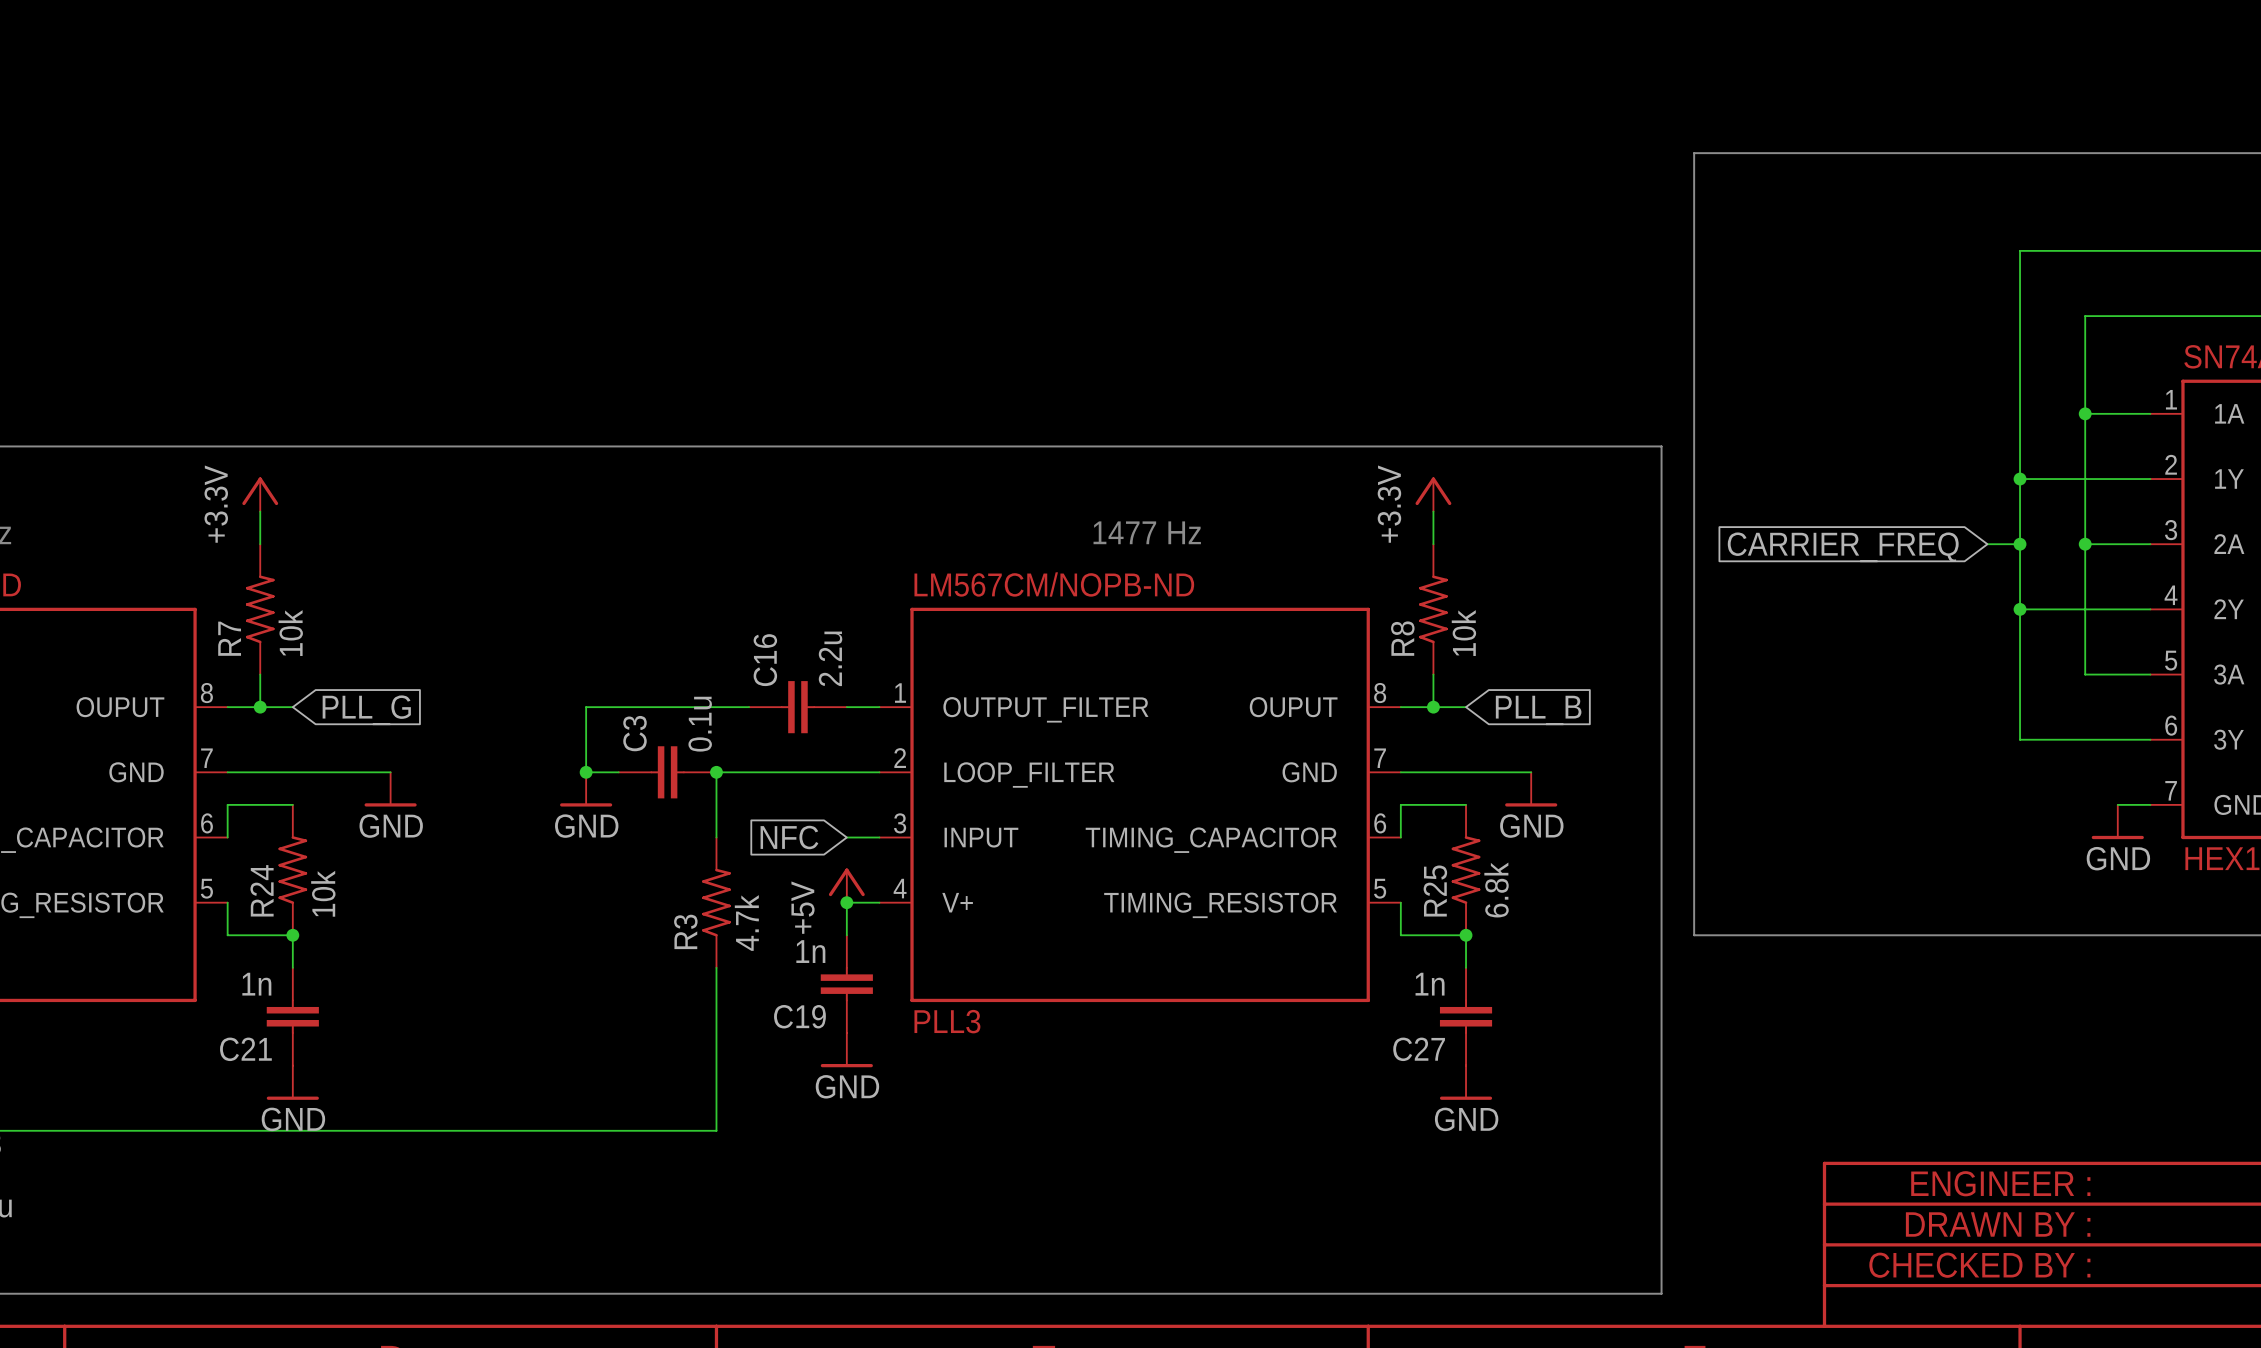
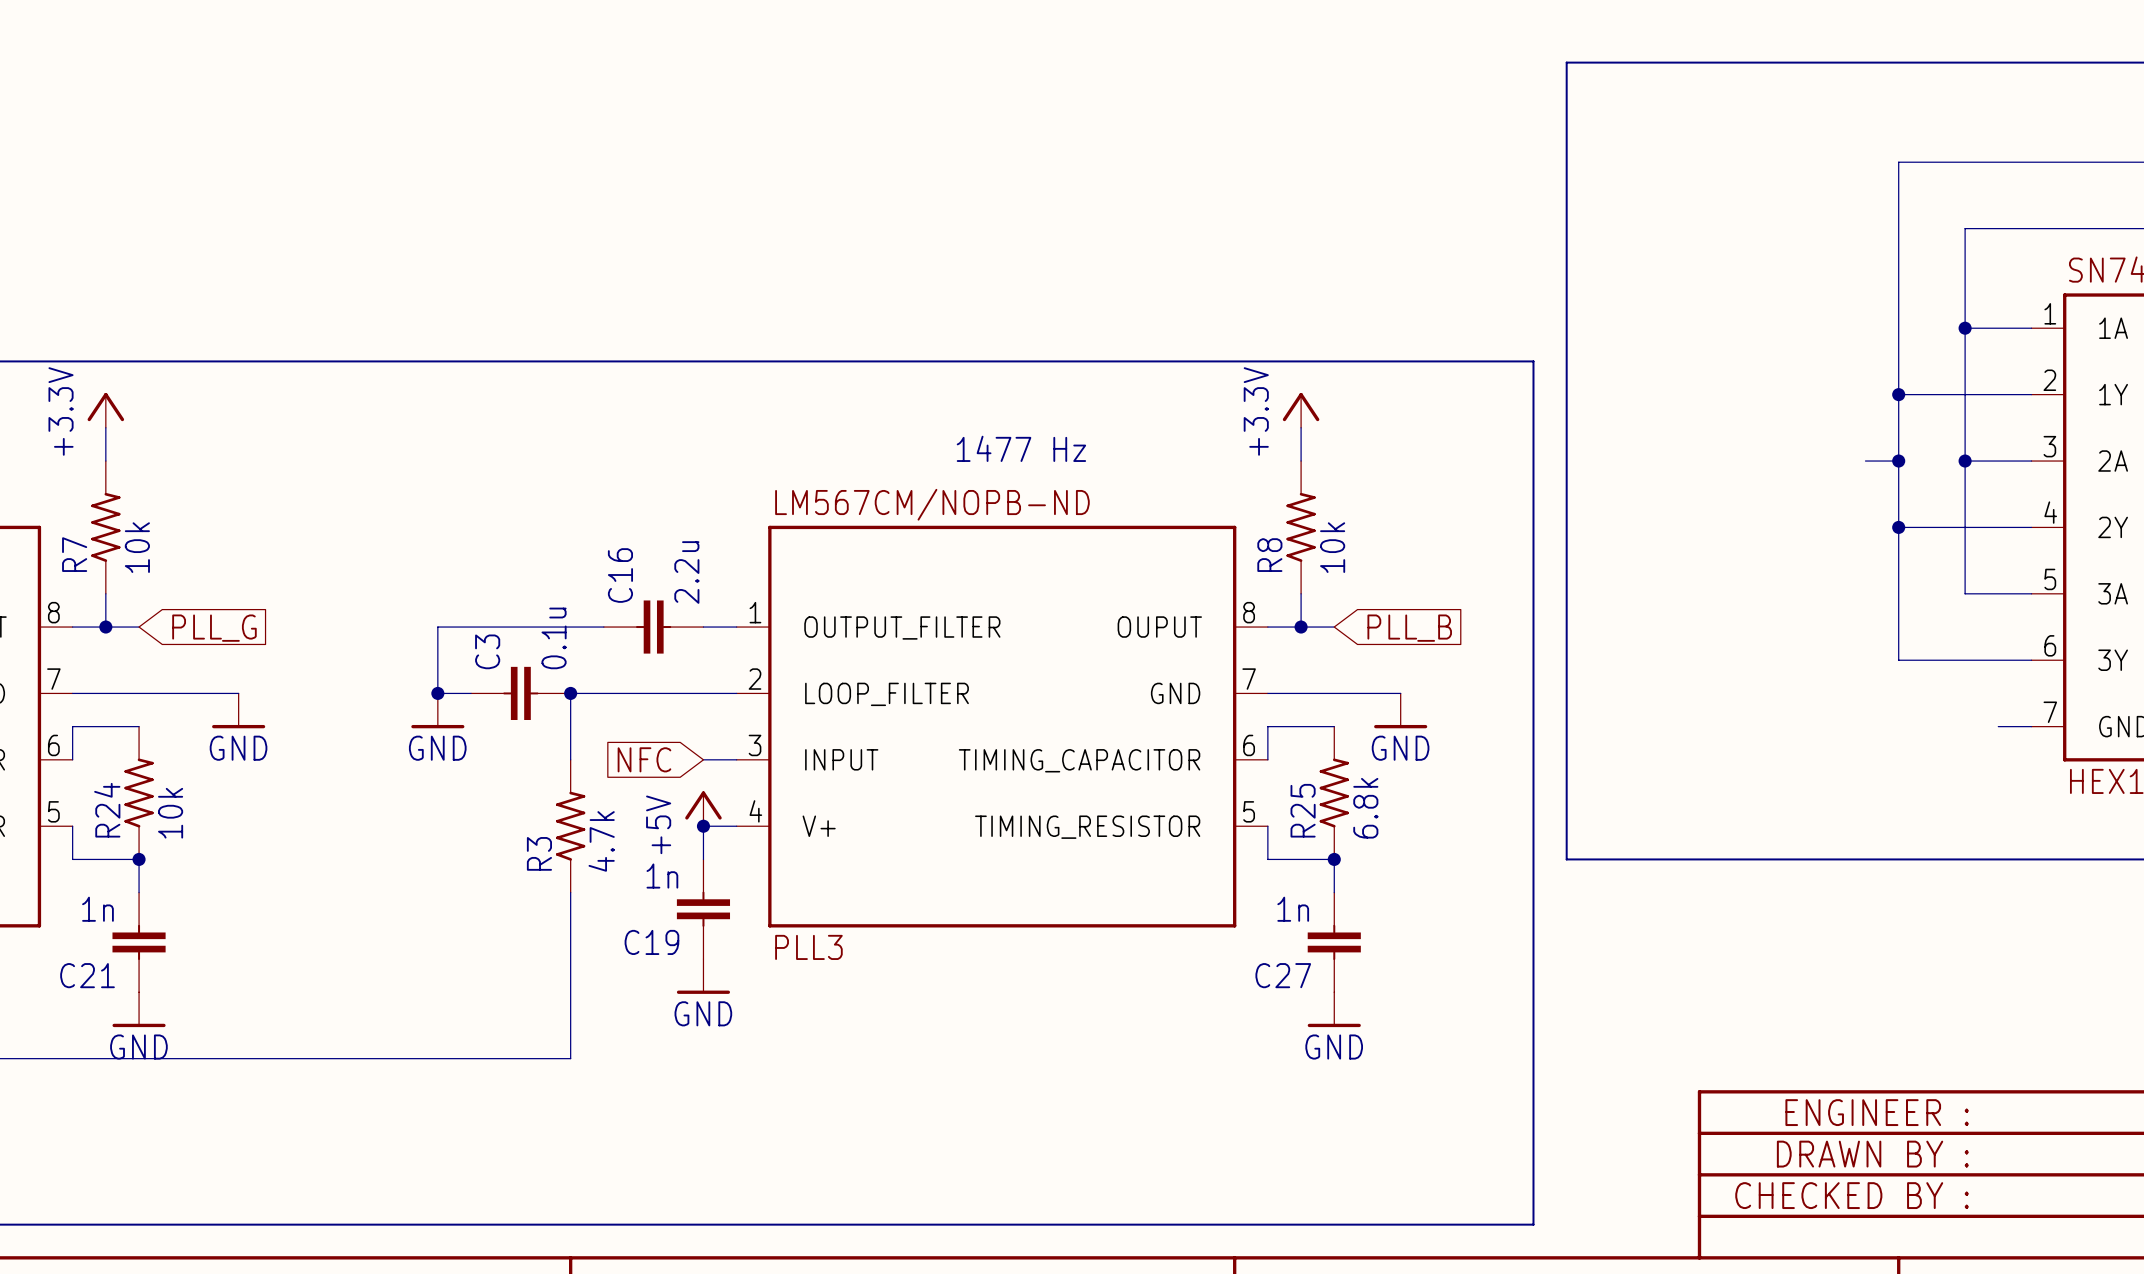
global label: CARRIER_FREQ (1843, 547) -> none
power symbol: GND (2117, 822) -> none

